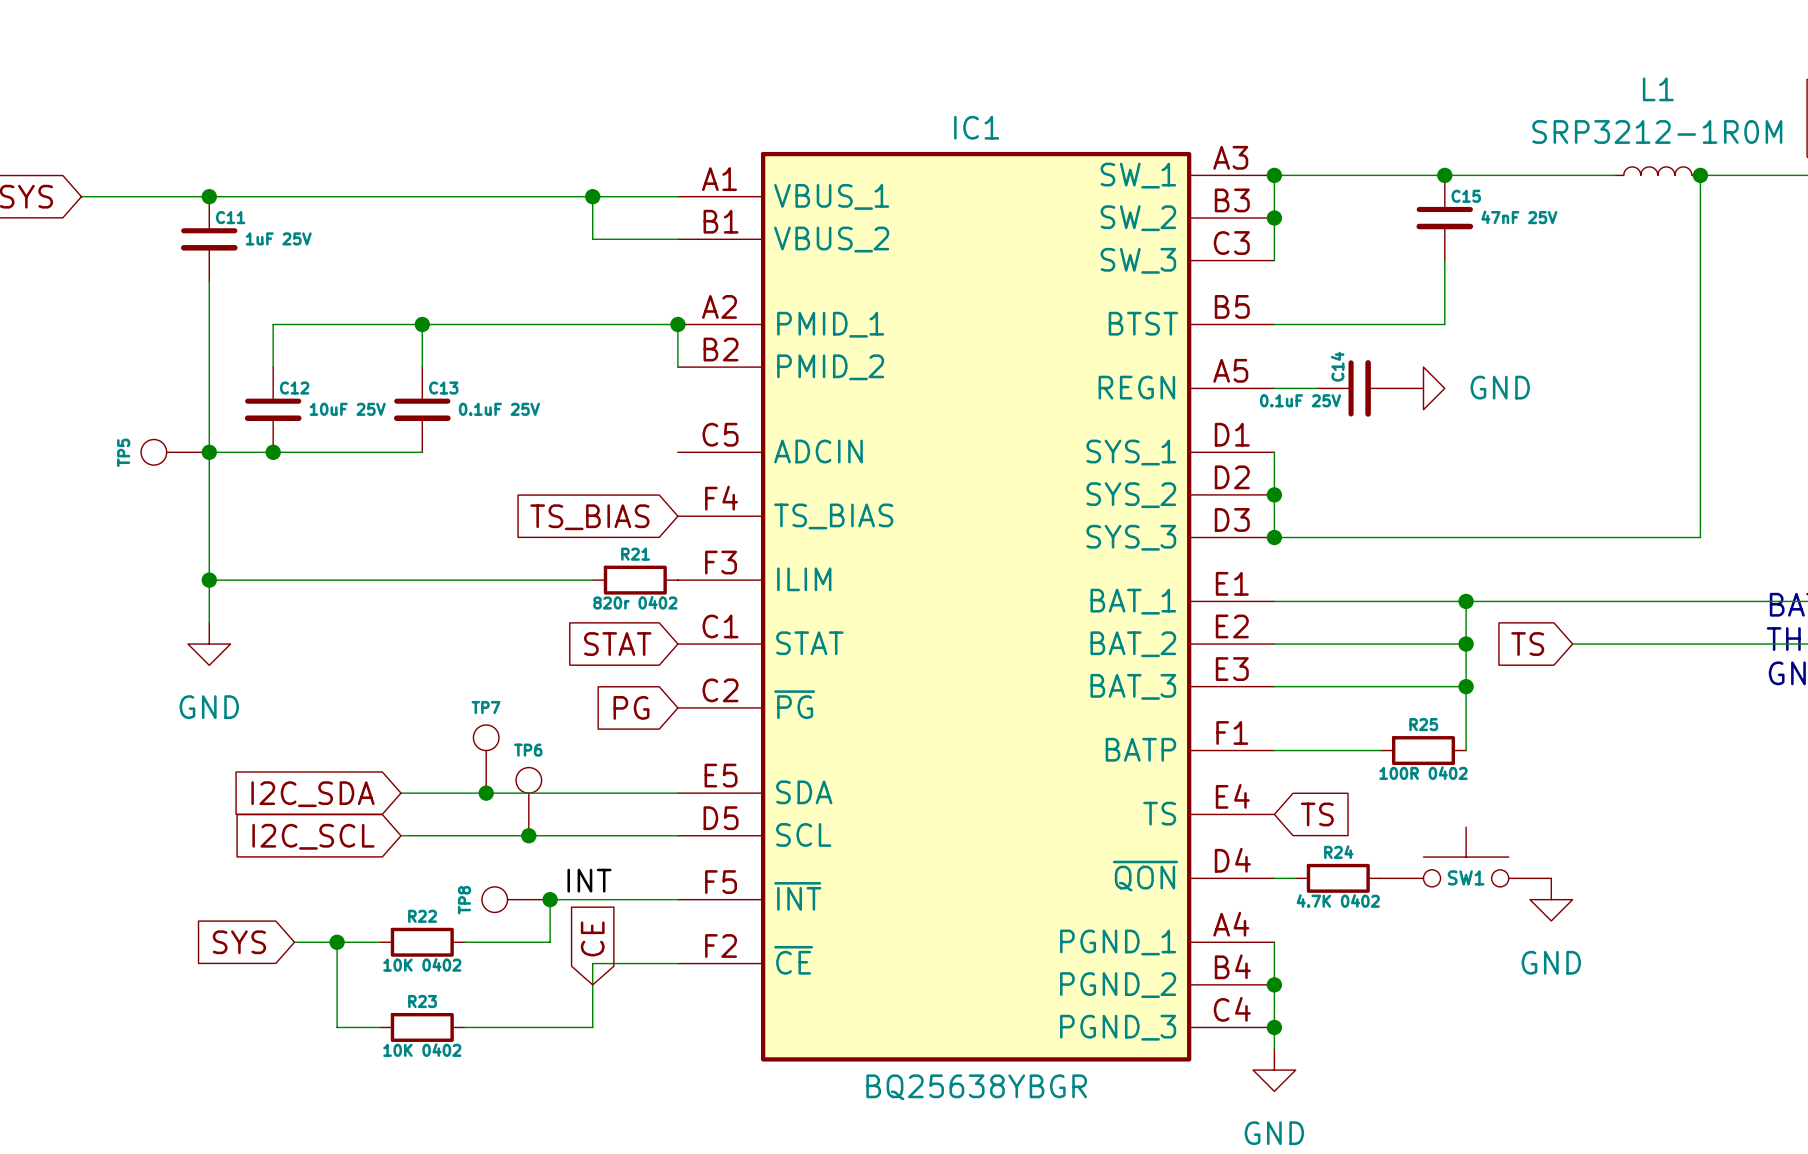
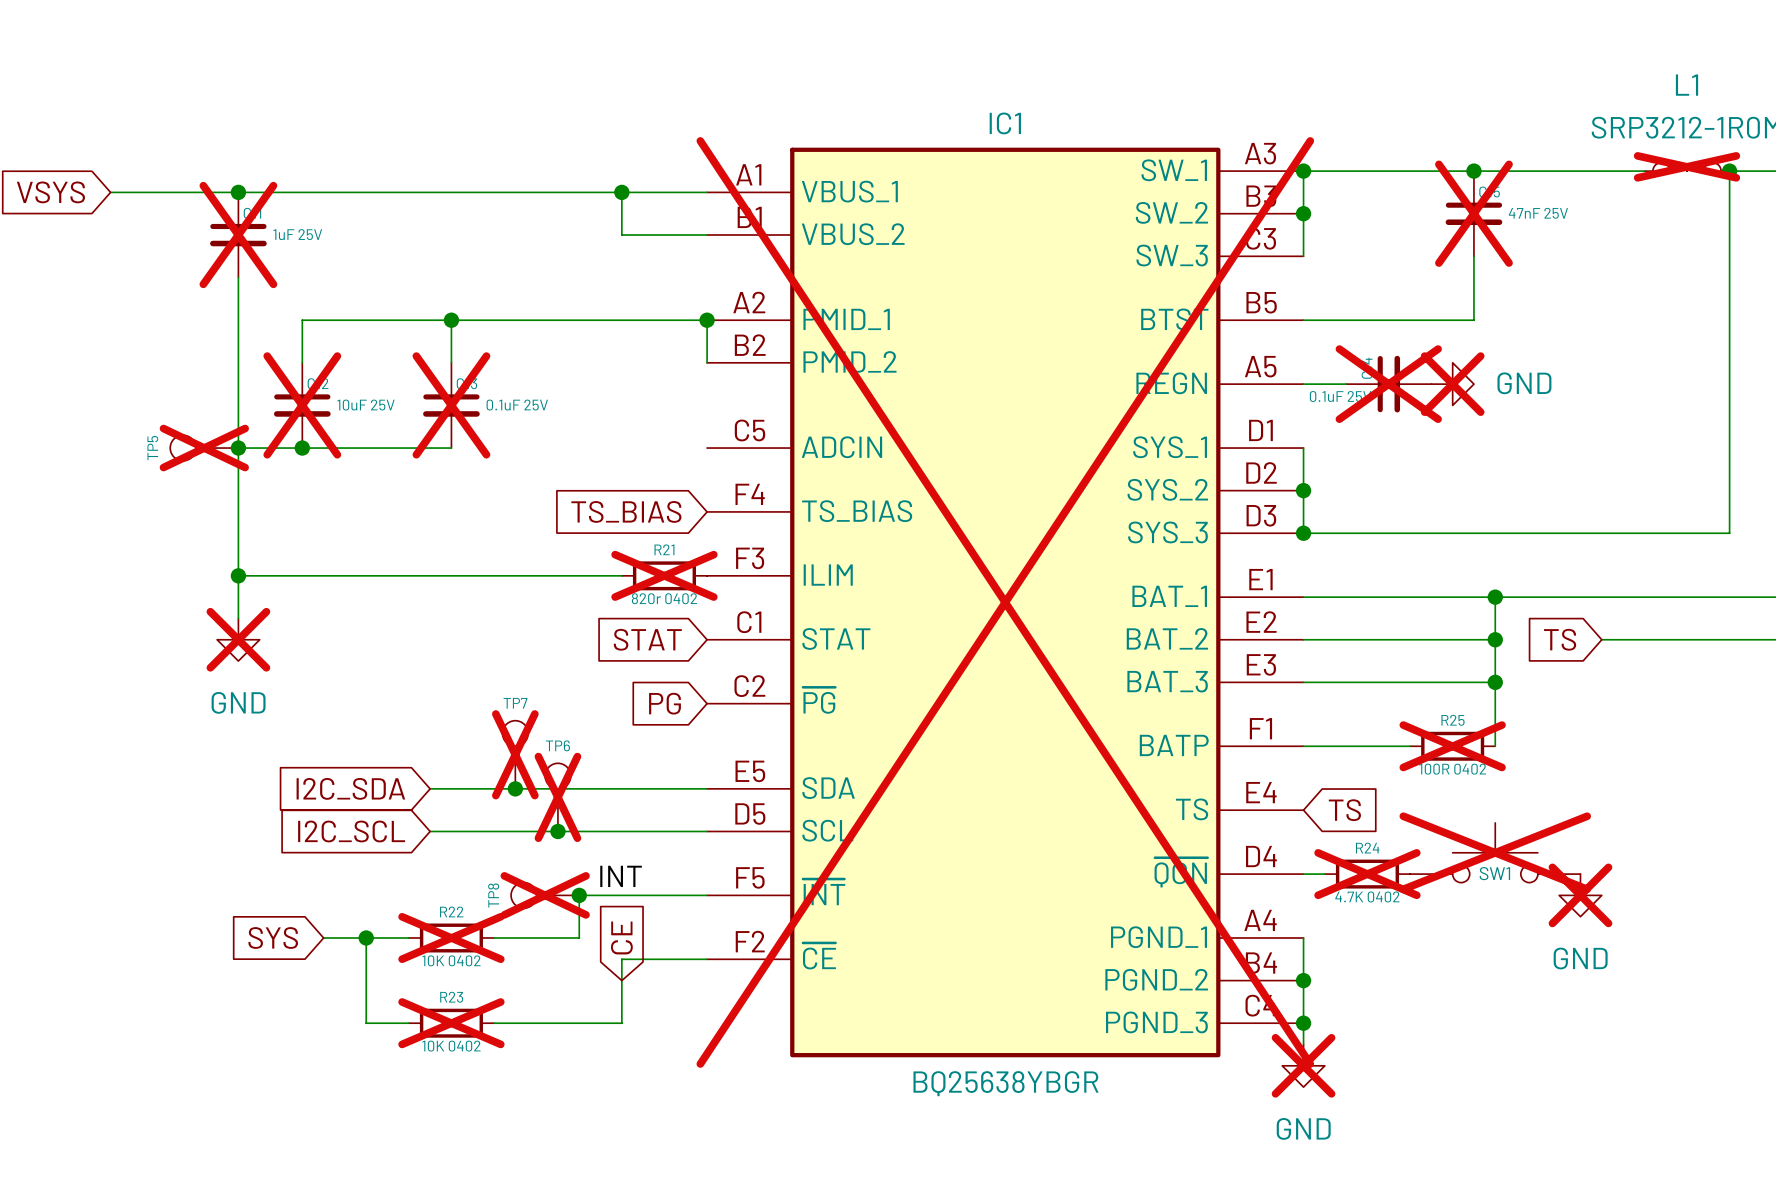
L1 do-not-place cross: none -> (1686, 166)
C15 do-not-place cross: none -> (1473, 213)
C11 do-not-place cross: none -> (238, 235)
C14 do-not-place cross: none -> (1388, 384)
power symbol do-not-place cross: none -> (1452, 384)
C12 do-not-place cross: none -> (302, 405)
C13 do-not-place cross: none -> (451, 405)
TP5 do-not-place cross: none -> (204, 448)
R21 do-not-place cross: none -> (664, 575)
IC1 do-not-place cross: none -> (1005, 602)
power symbol do-not-place cross: none -> (238, 639)
R25 do-not-place cross: none -> (1452, 746)
TP7 do-not-place cross: none -> (515, 754)
TP6 do-not-place cross: none -> (557, 797)
SW1 do-not-place cross: none -> (1495, 852)
R24 do-not-place cross: none -> (1367, 874)
TP8 do-not-place cross: none -> (545, 895)
power symbol do-not-place cross: none -> (1580, 895)
R22 do-not-place cross: none -> (451, 937)
R23 do-not-place cross: none -> (451, 1023)
power symbol do-not-place cross: none -> (1303, 1065)

